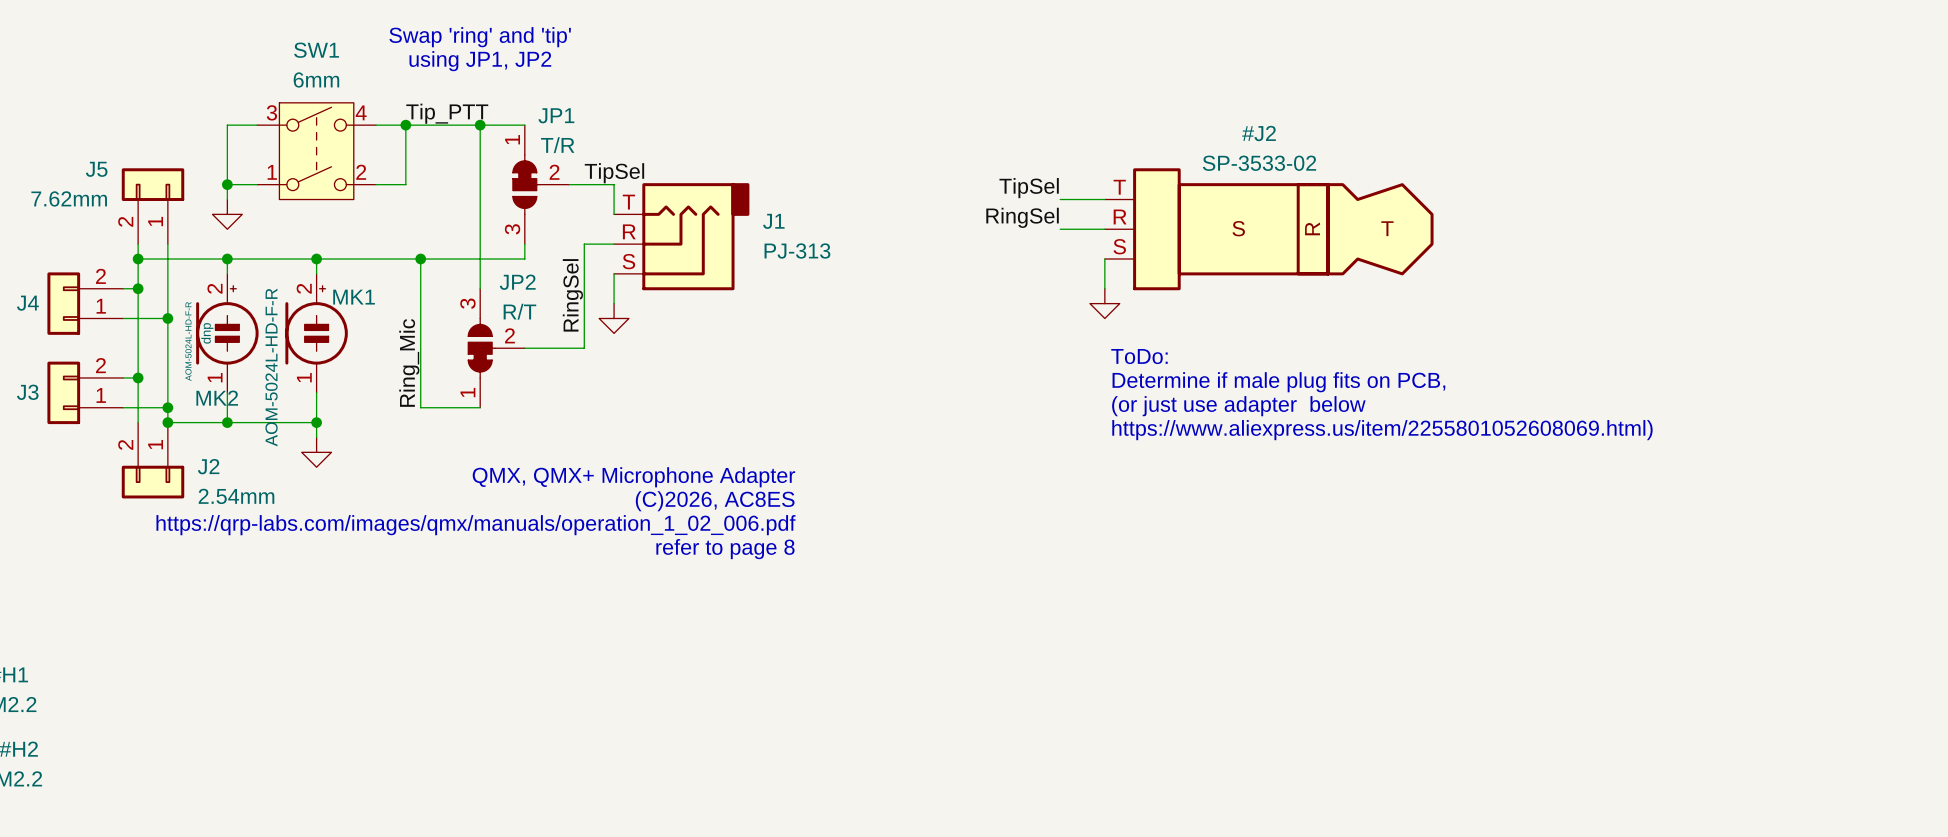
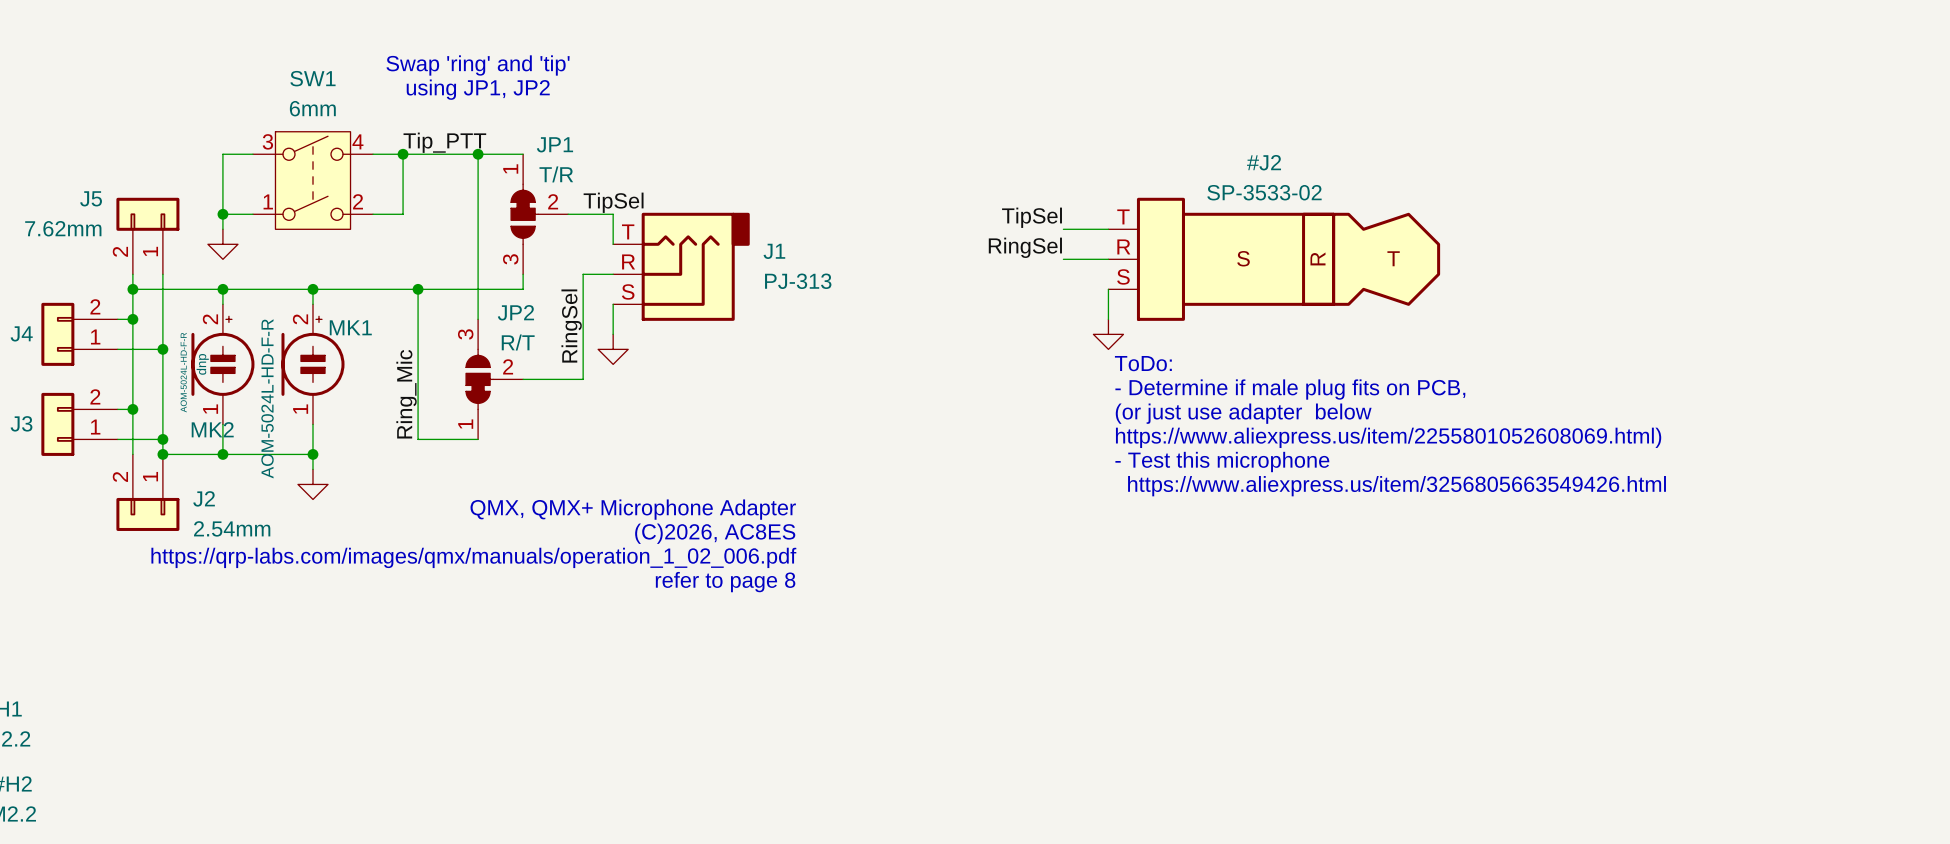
text: none -> ToDo: (1143, 363)
text: ToDo: (1139, 356) -> - Determine if male plug fits on PCB, (1290, 389)
text: Determine if male plug fits on PCB, (1278, 382) -> (or just use adapter below (1243, 413)
text: (or just use adapter below (1238, 406) -> https://www.aliexpress.us/item/2255801052608069.html) (1388, 437)
text: https://www.aliexpress.us/item/2255801052608069.html) (1382, 430) -> - Test this microphone (1222, 462)
text: none -> https://www.aliexpress.us/item/3256805663549426.html (1397, 486)

